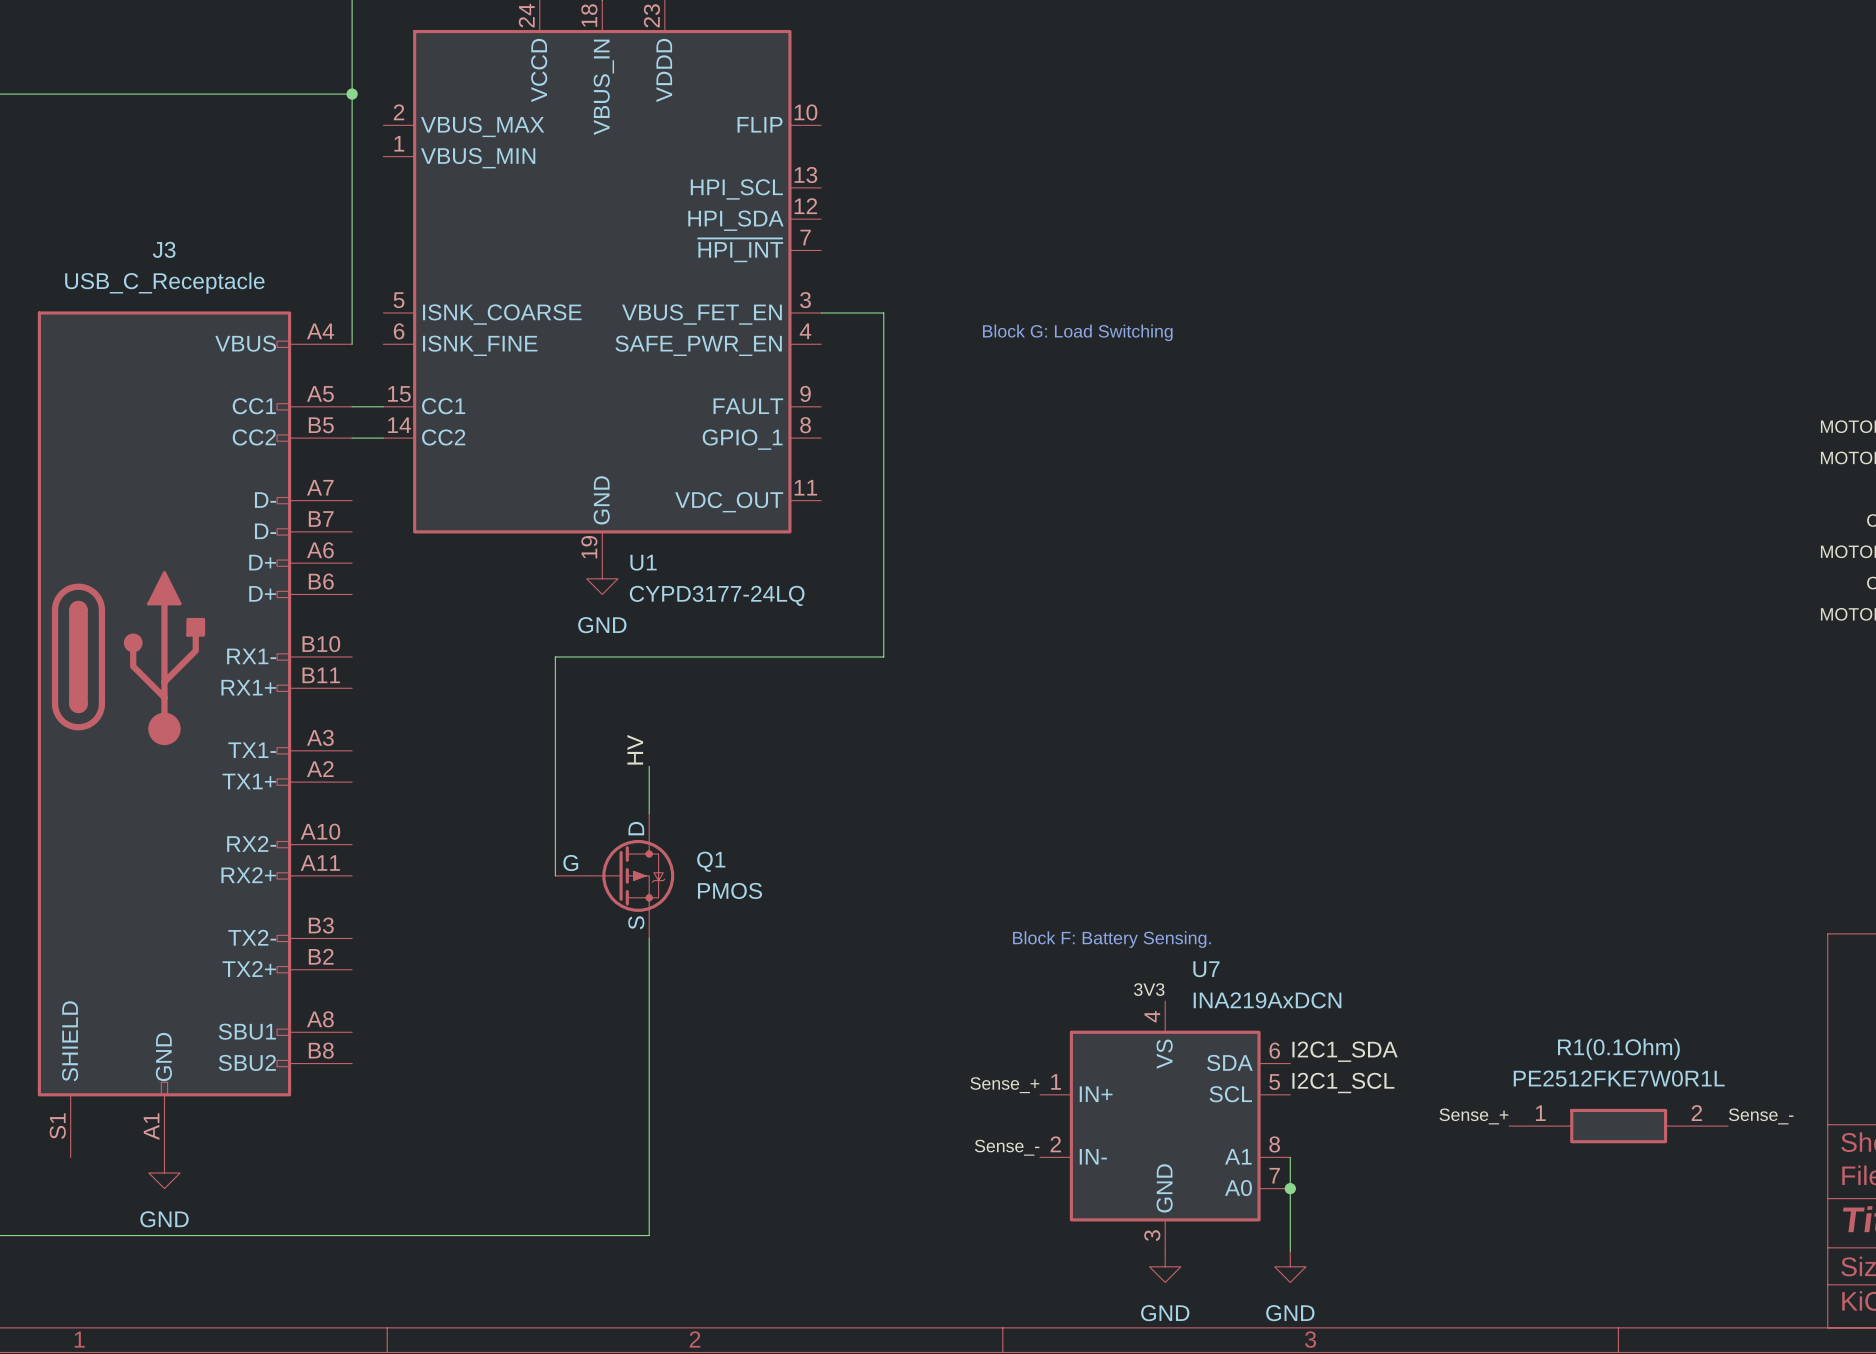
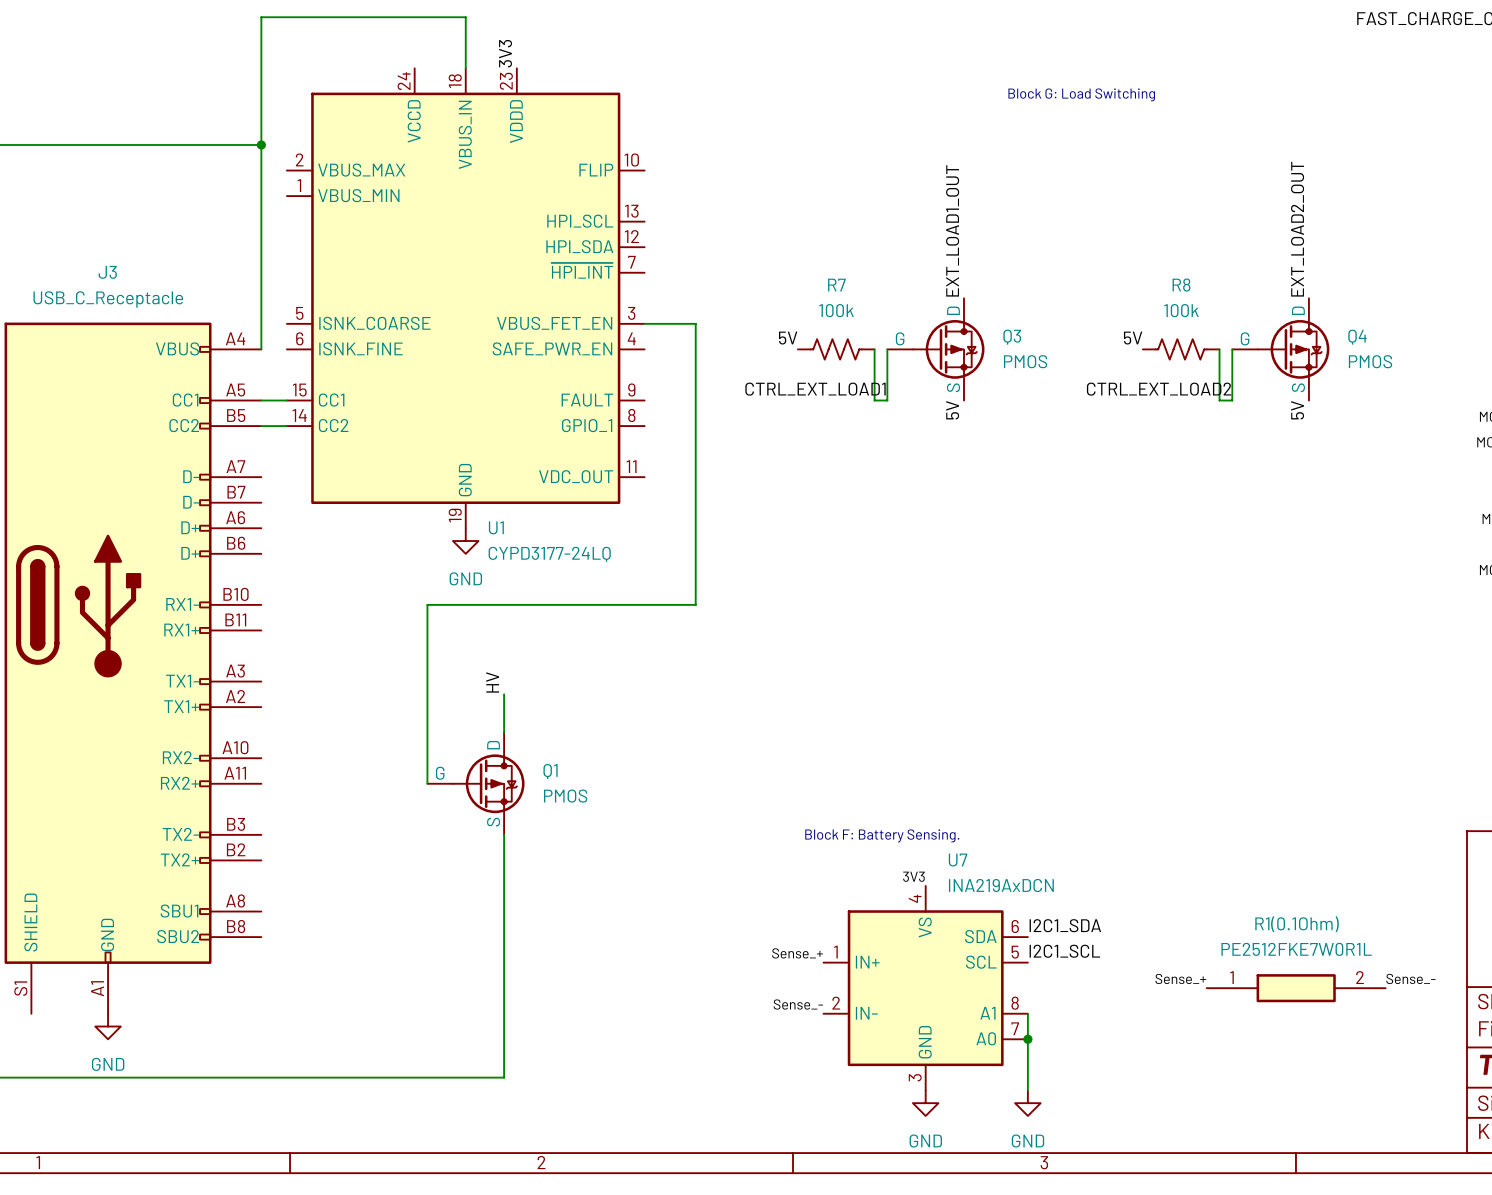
text: none -> Block G: Load Switching (1081, 94)
label: none -> EXT_LOAD1_OUT (952, 230)
label: none -> EXT_LOAD2_OUT (1297, 229)
label: none -> 5V (788, 338)
label: none -> 5V (1133, 338)
text: Block G: Load Switching (1077, 332) -> none
R7: none -> 100k (836, 349)
wire: none -> (874, 349) (874, 400) (887, 400) (887, 349)
Q3: none -> PMOS (935, 349)
R8: none -> 100k (1181, 349)
wire: none -> (1219, 349) (1219, 400) (1232, 400) (1232, 349)
Q4: none -> PMOS (1280, 349)
label: none -> CTRL_EXT_LOAD1 (815, 389)
label: none -> CTRL_EXT_LOAD2 (1159, 389)
label: none -> 5V (952, 410)
label: none -> 5V (1297, 410)

